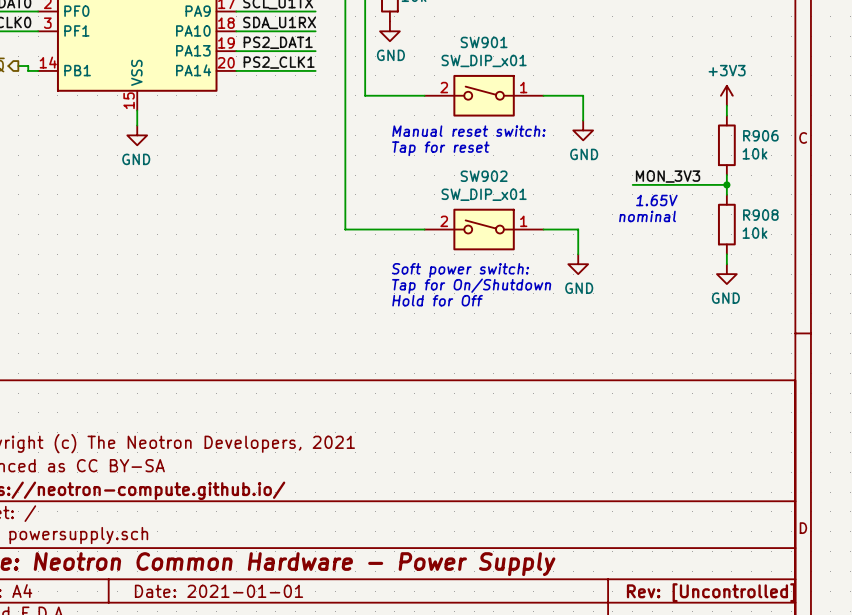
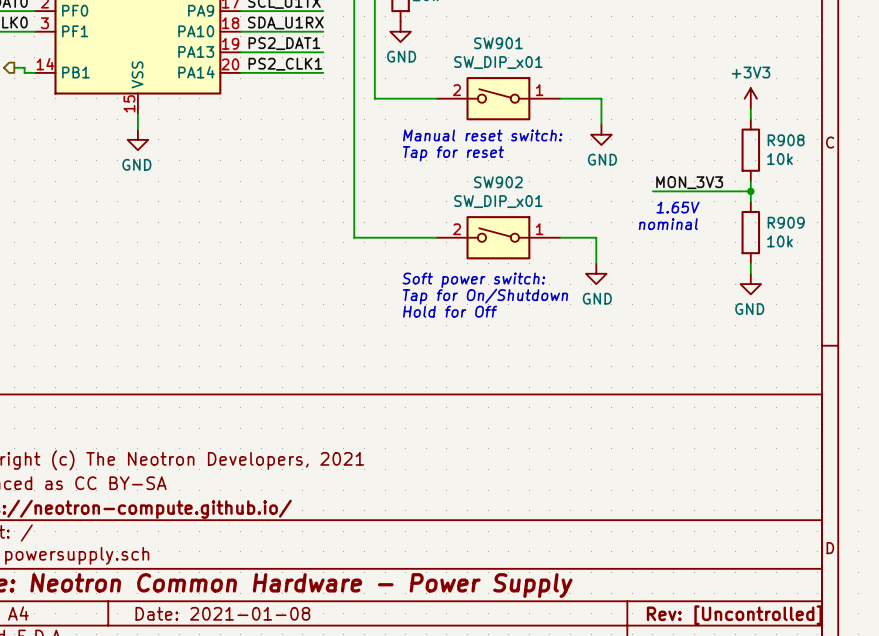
R906 name: R906 (760, 135) -> R908 (786, 140)
R908 name: R908 (760, 215) -> R909 (786, 222)
title block: Date: 2021-01-01 (219, 591) -> Date: 2021-01-08 (222, 613)

